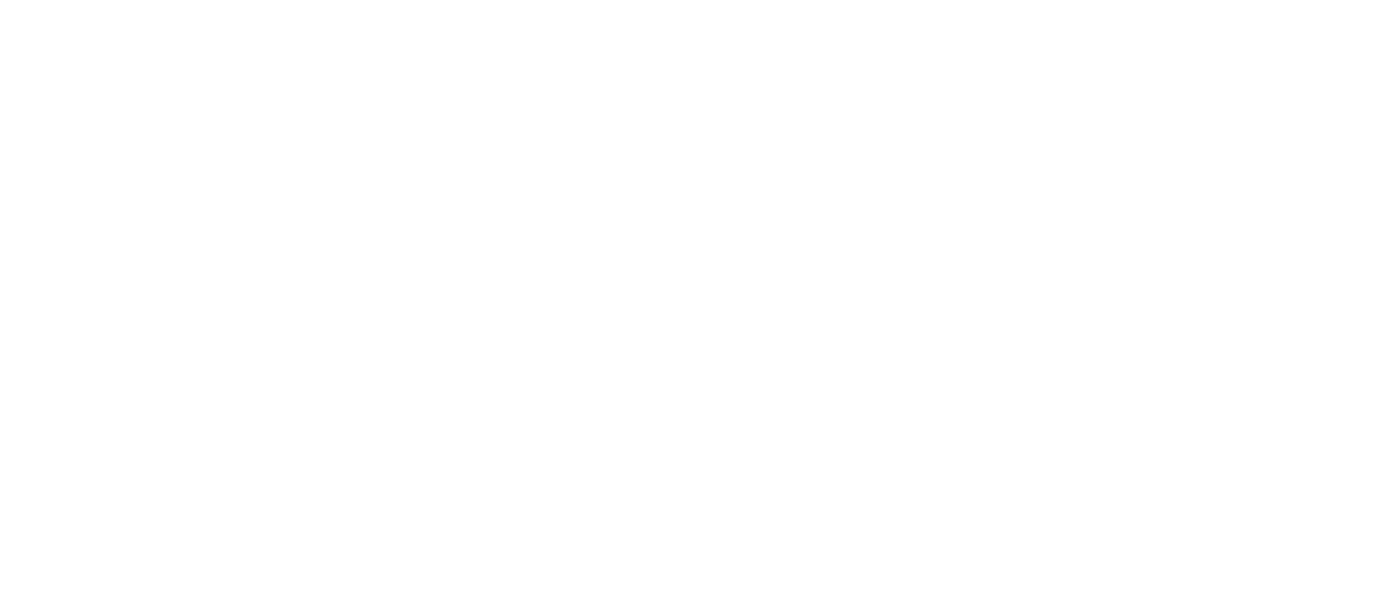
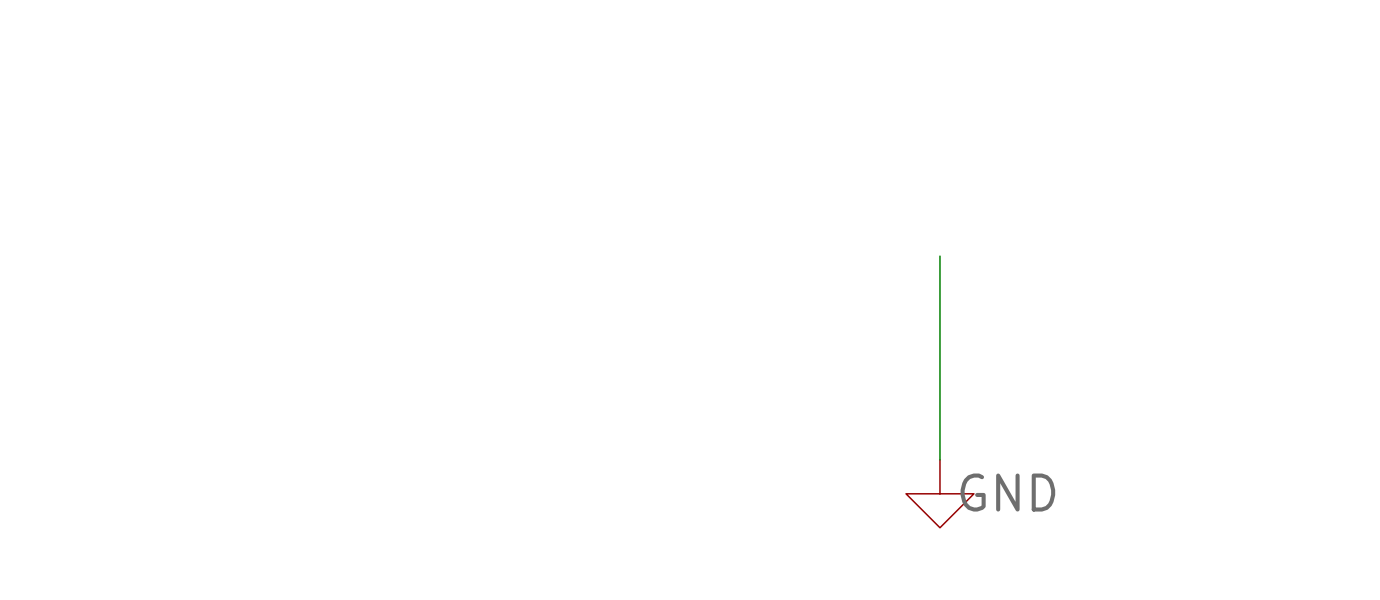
wire: none -> (939, 256) (939, 459)
power symbol: none -> GND (939, 493)

